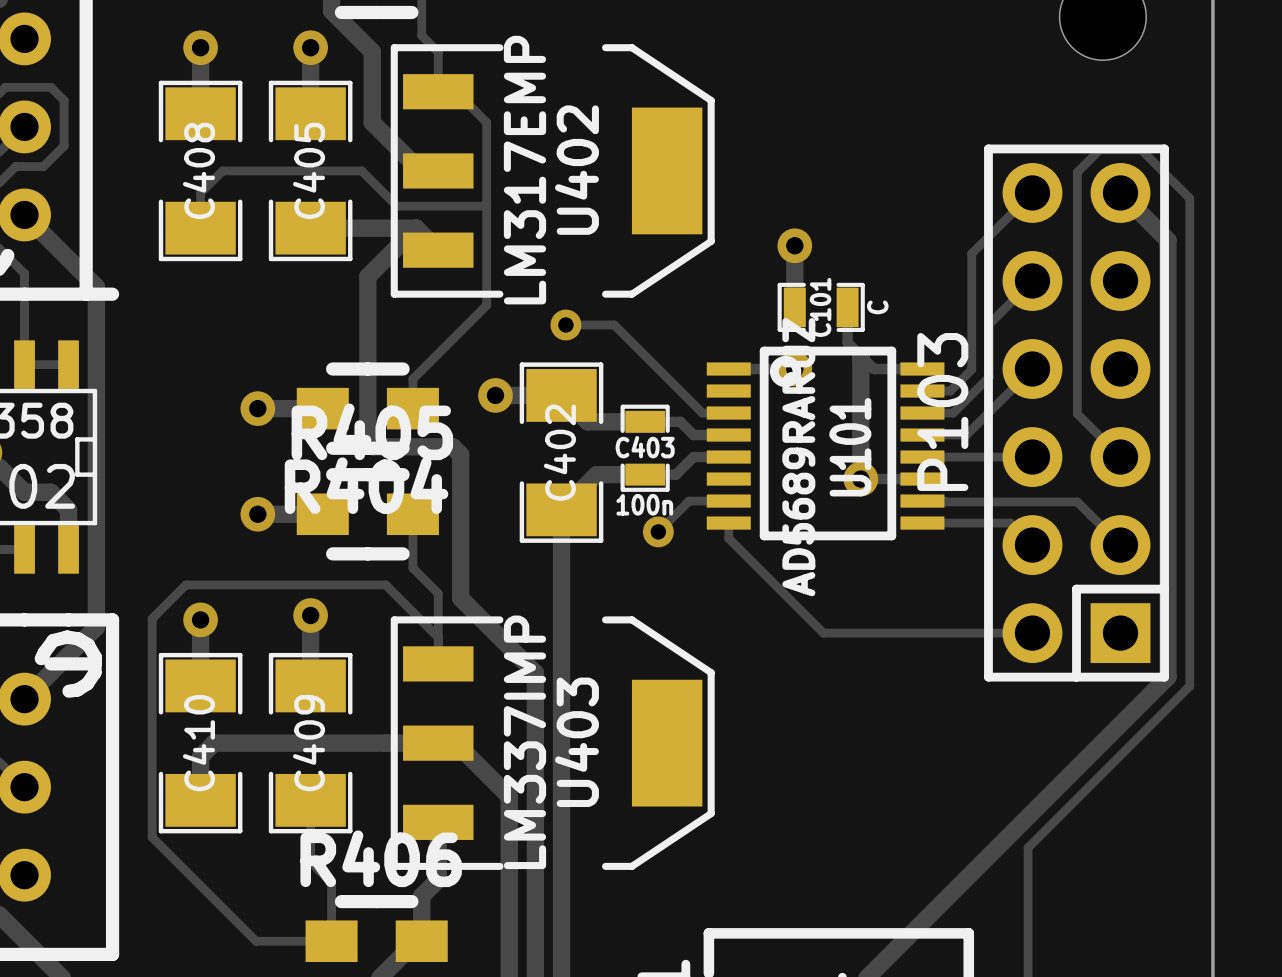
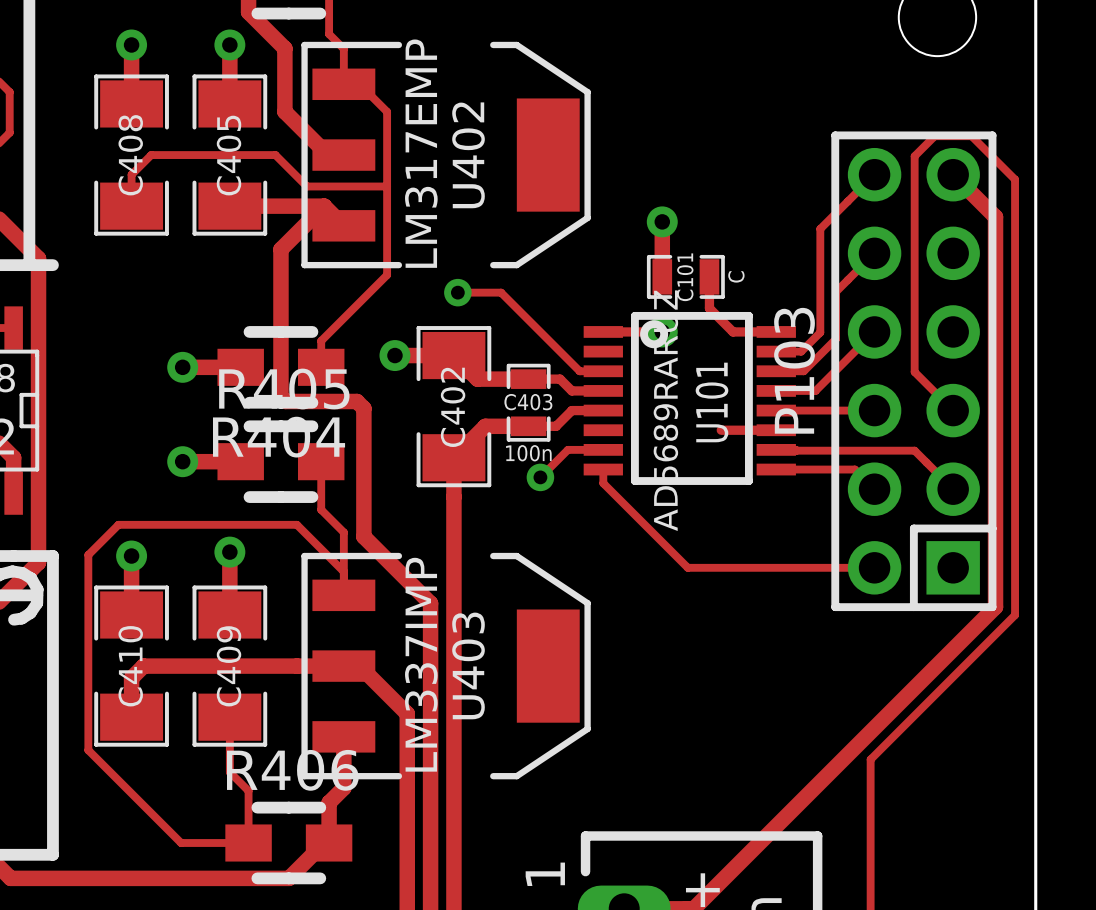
track: (860, 355) (860, 479) -> none
via: (860, 479) -> none

